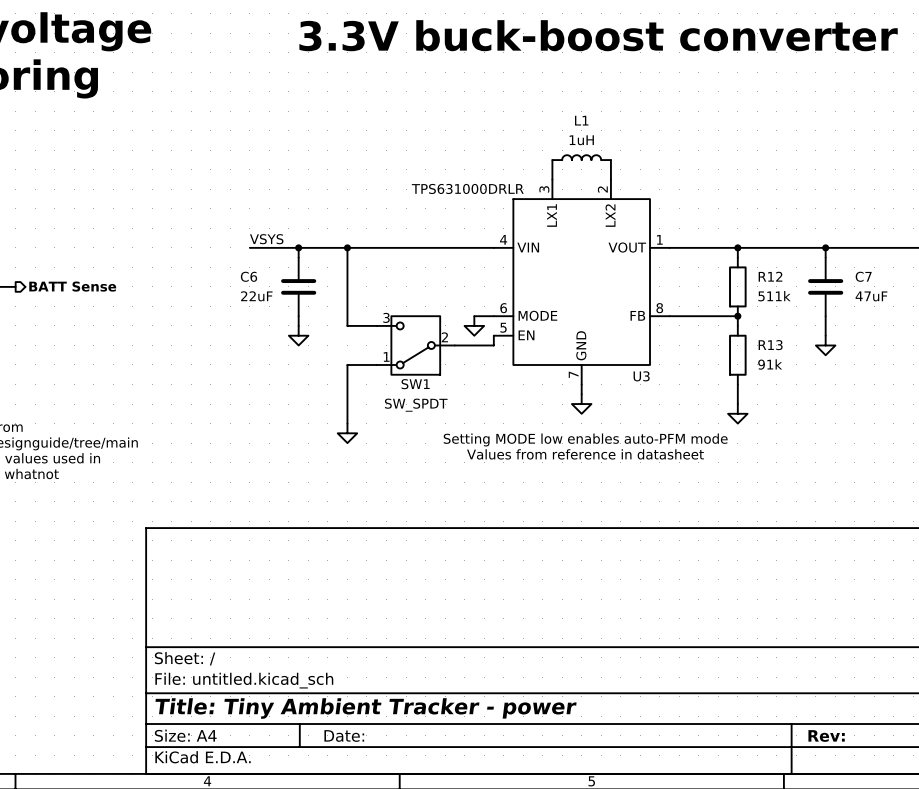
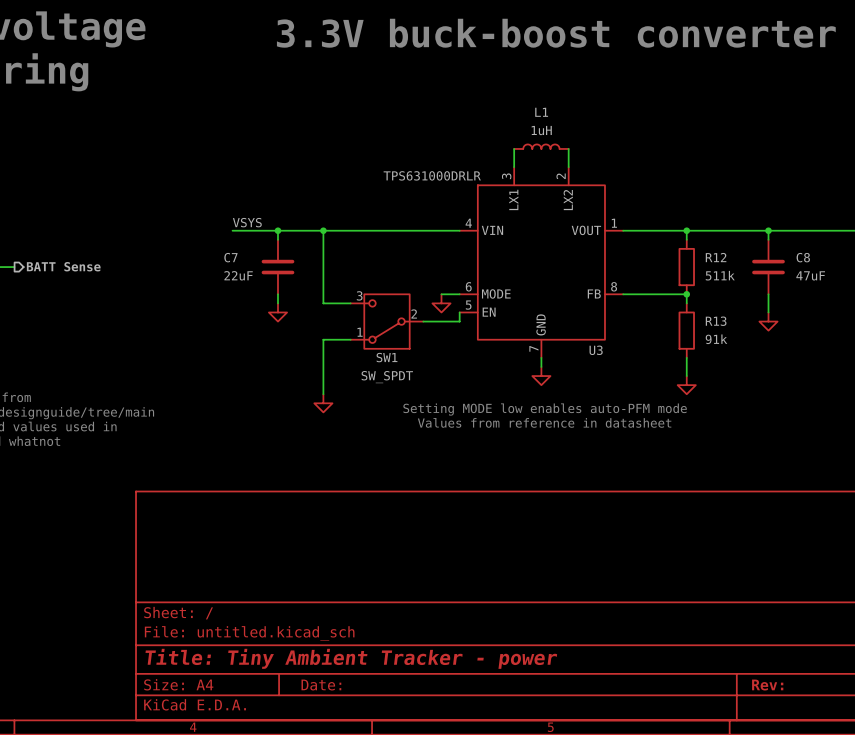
C6 name: C6 (249, 276) -> C7 (230, 257)
C7 name: C7 (863, 276) -> C8 (803, 257)

